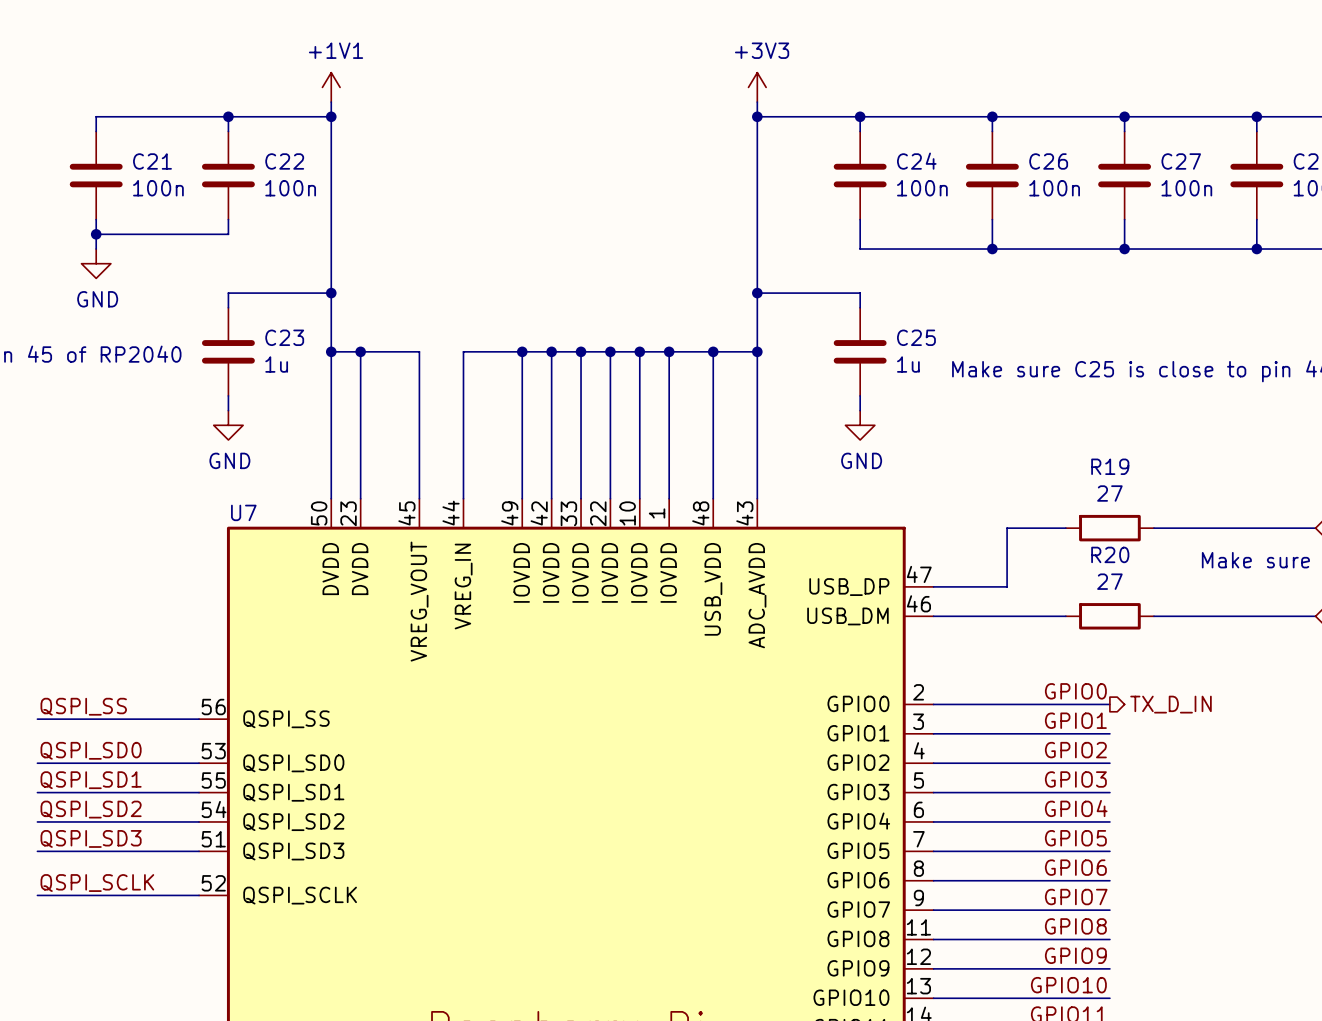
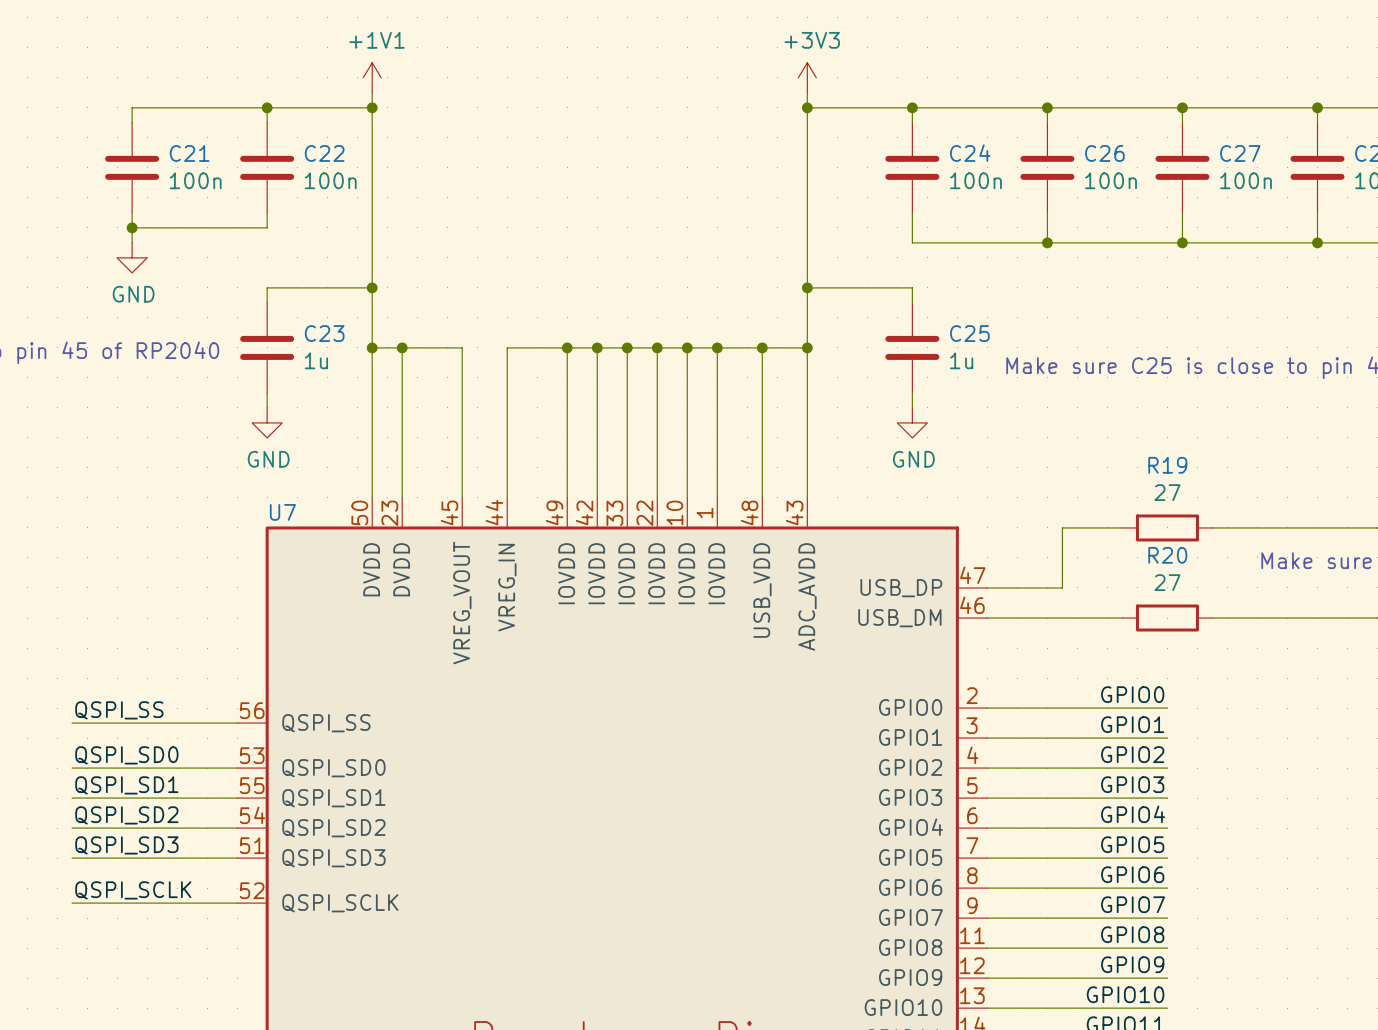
hierarchical label: TX_D_IN (1171, 704) -> none

